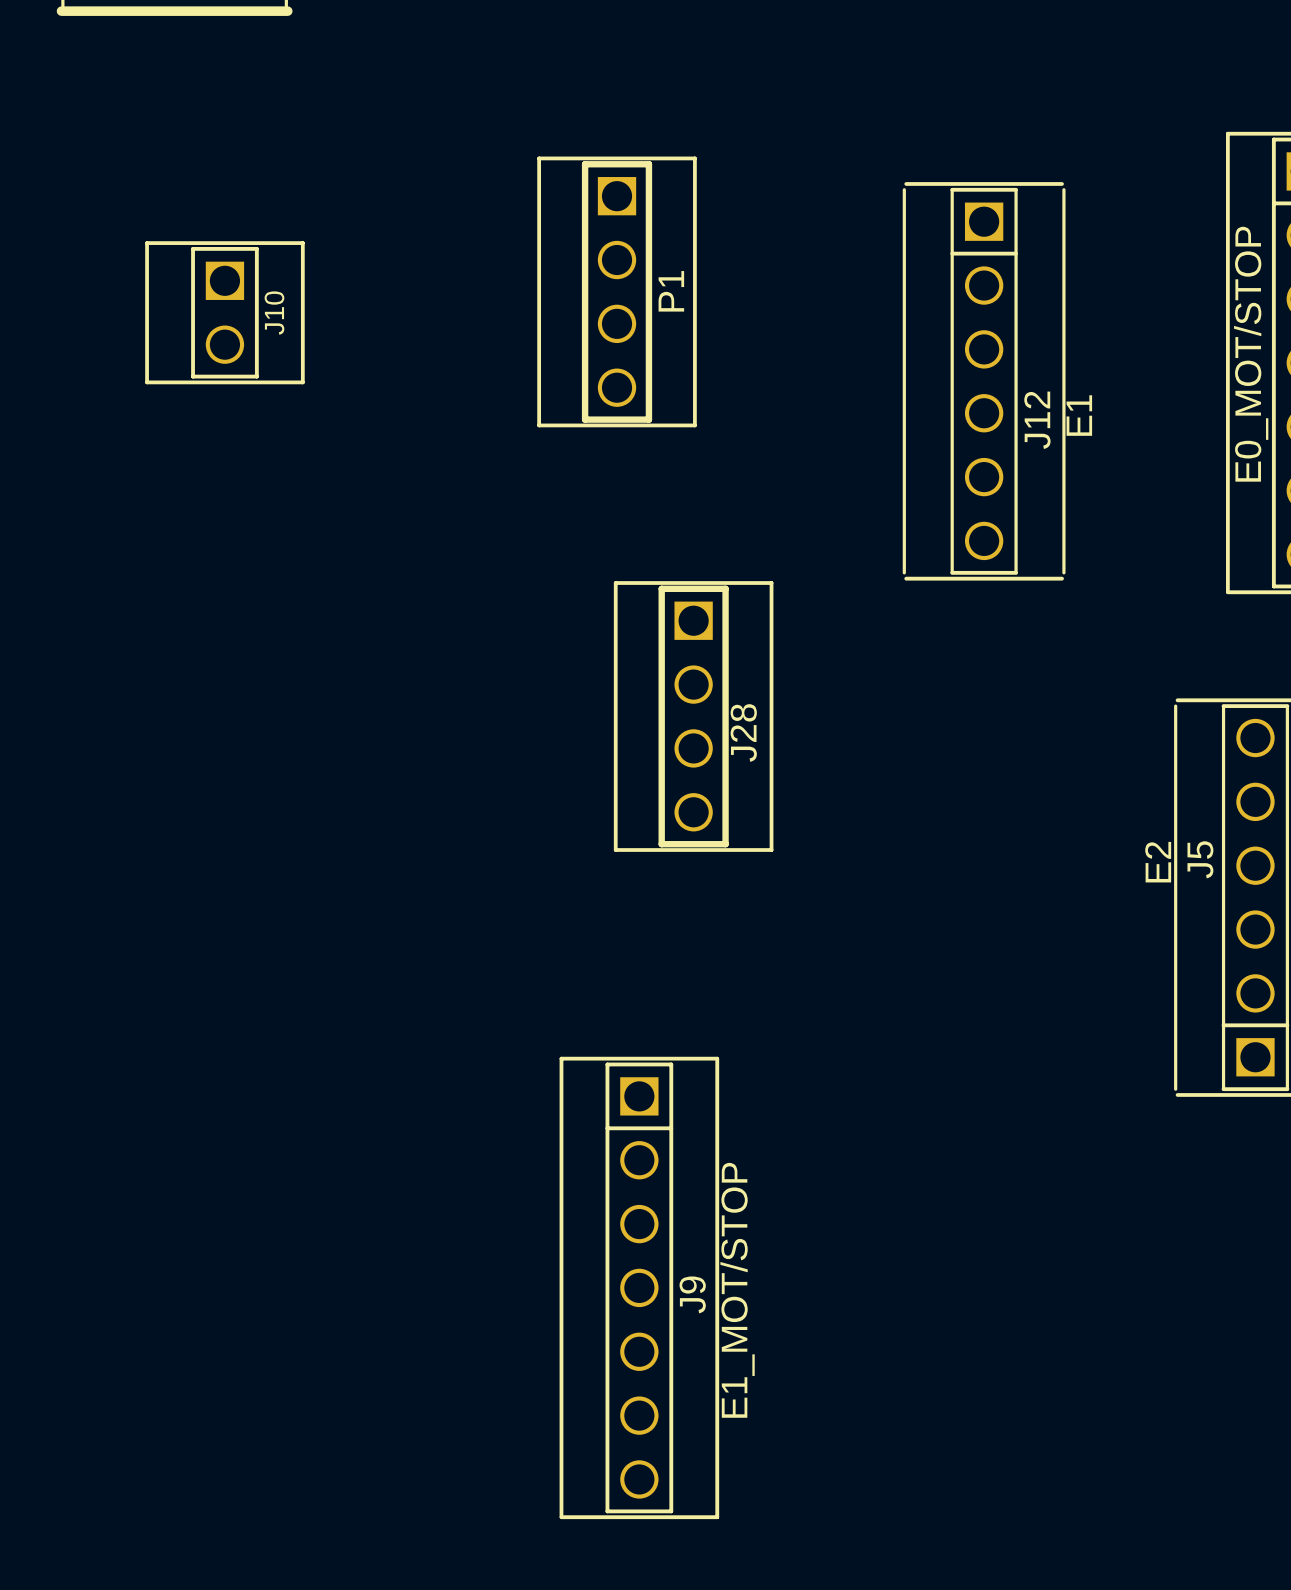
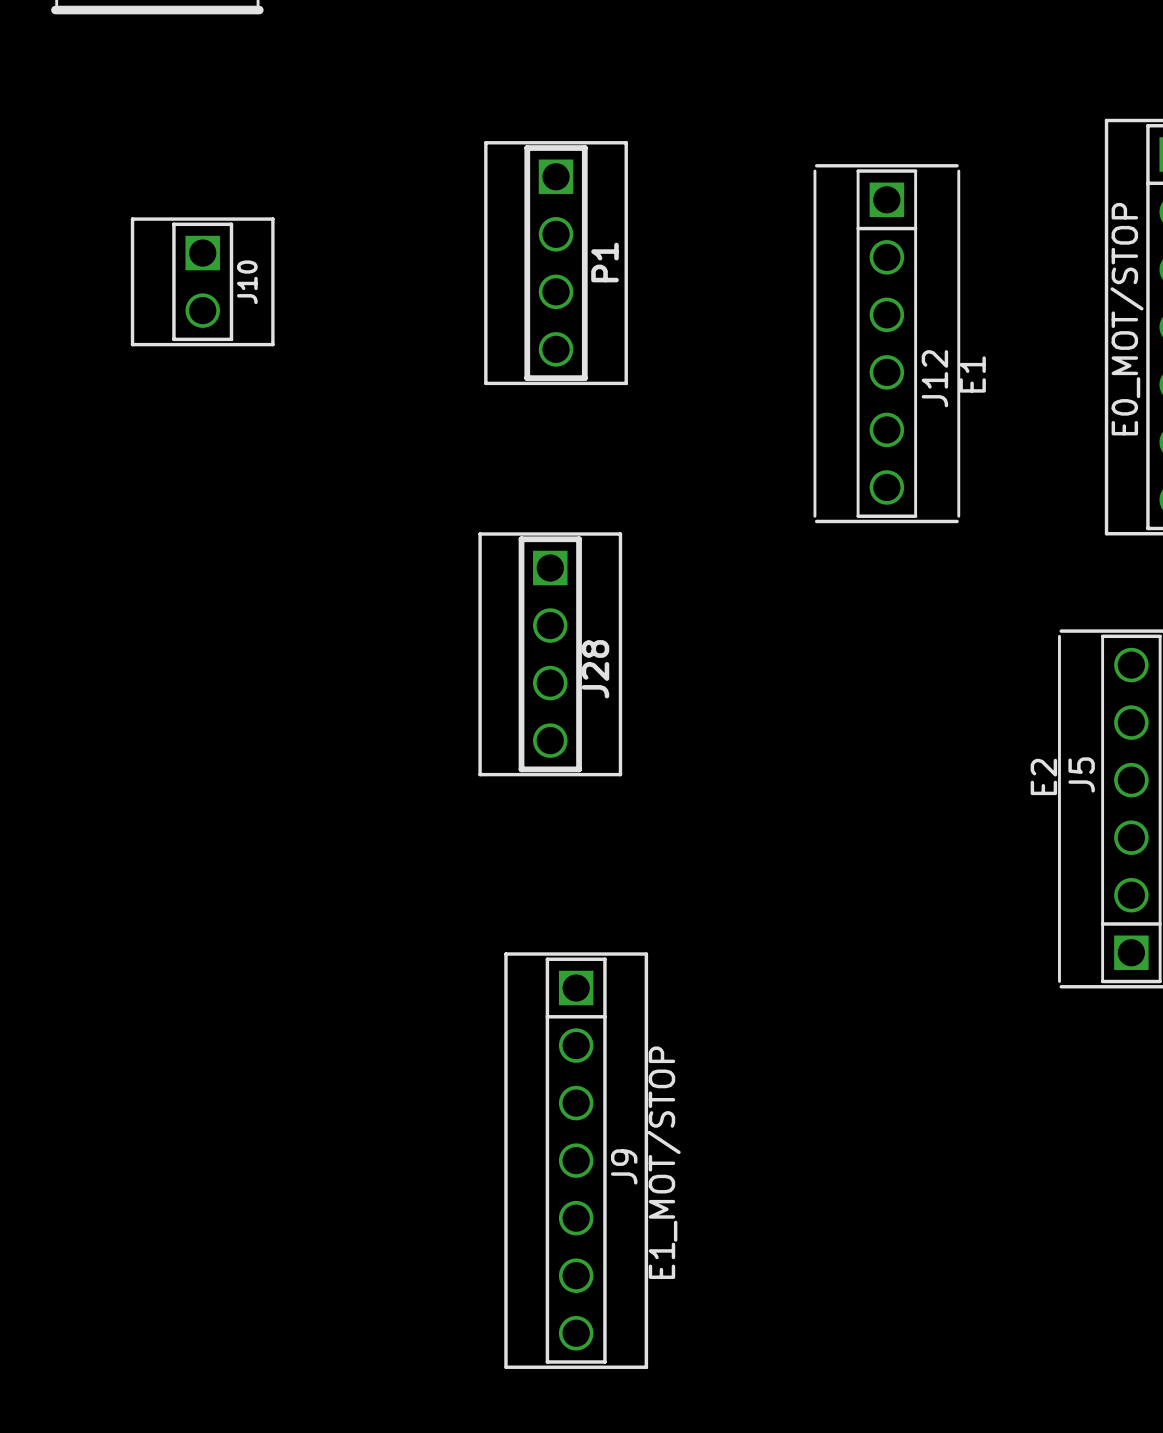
J28 position: (693, 716) -> (550, 654)

